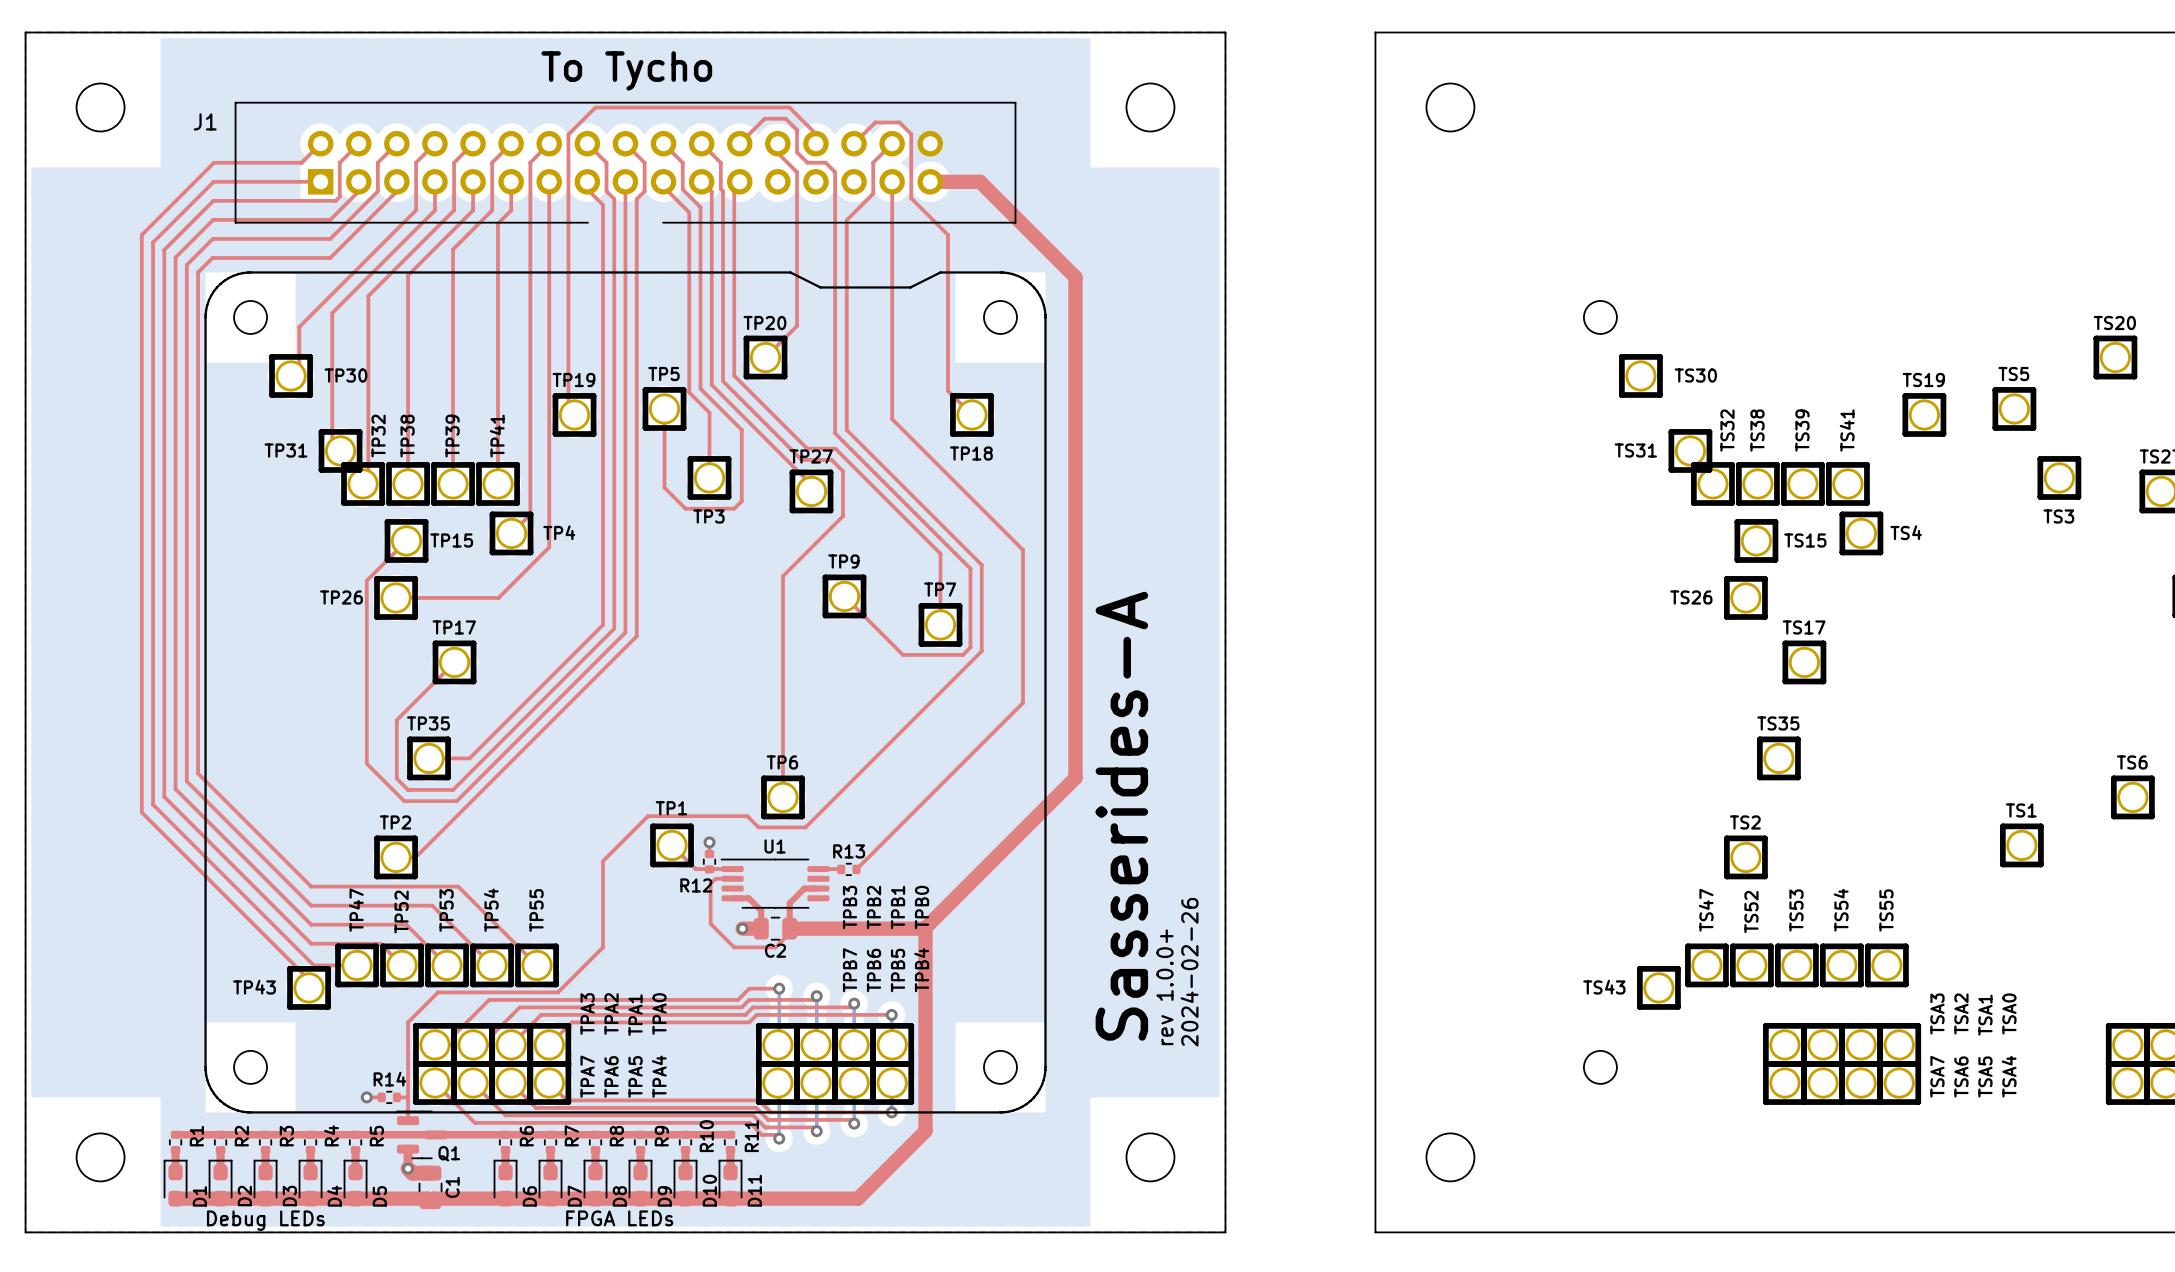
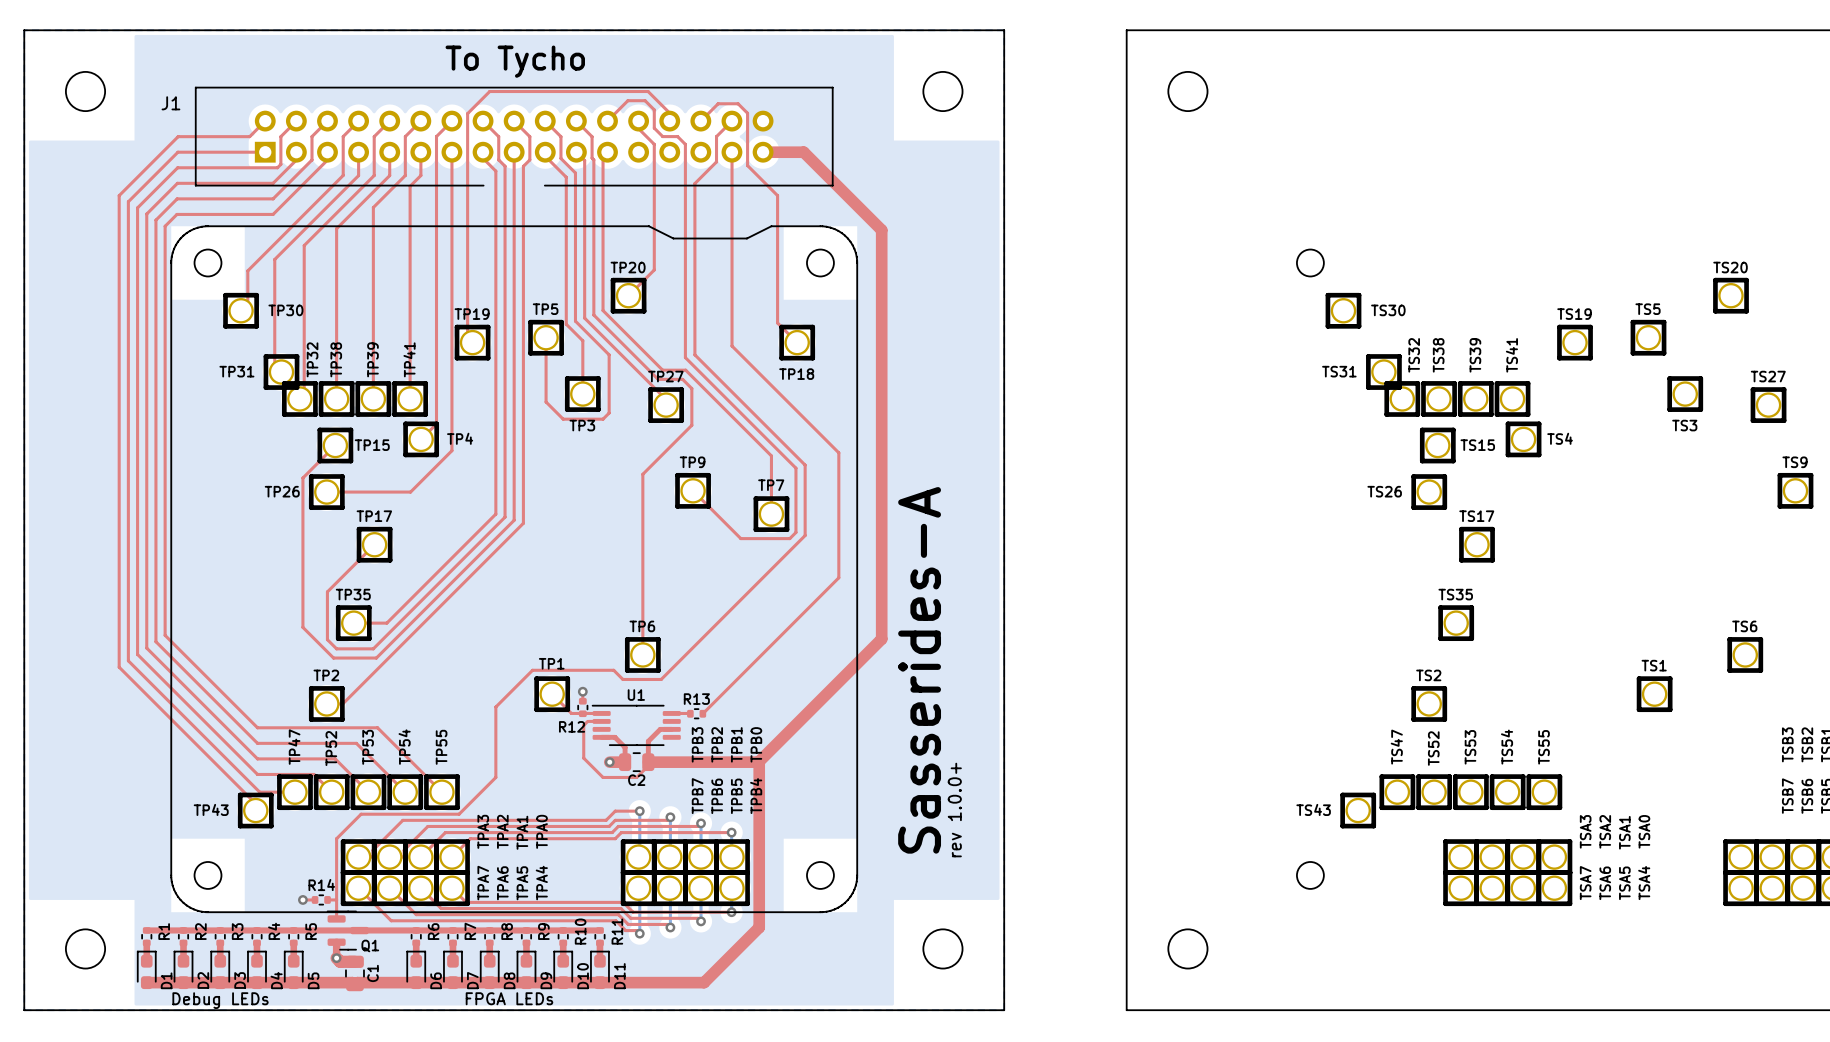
text: 2024-02-26 (1189, 972) -> none

